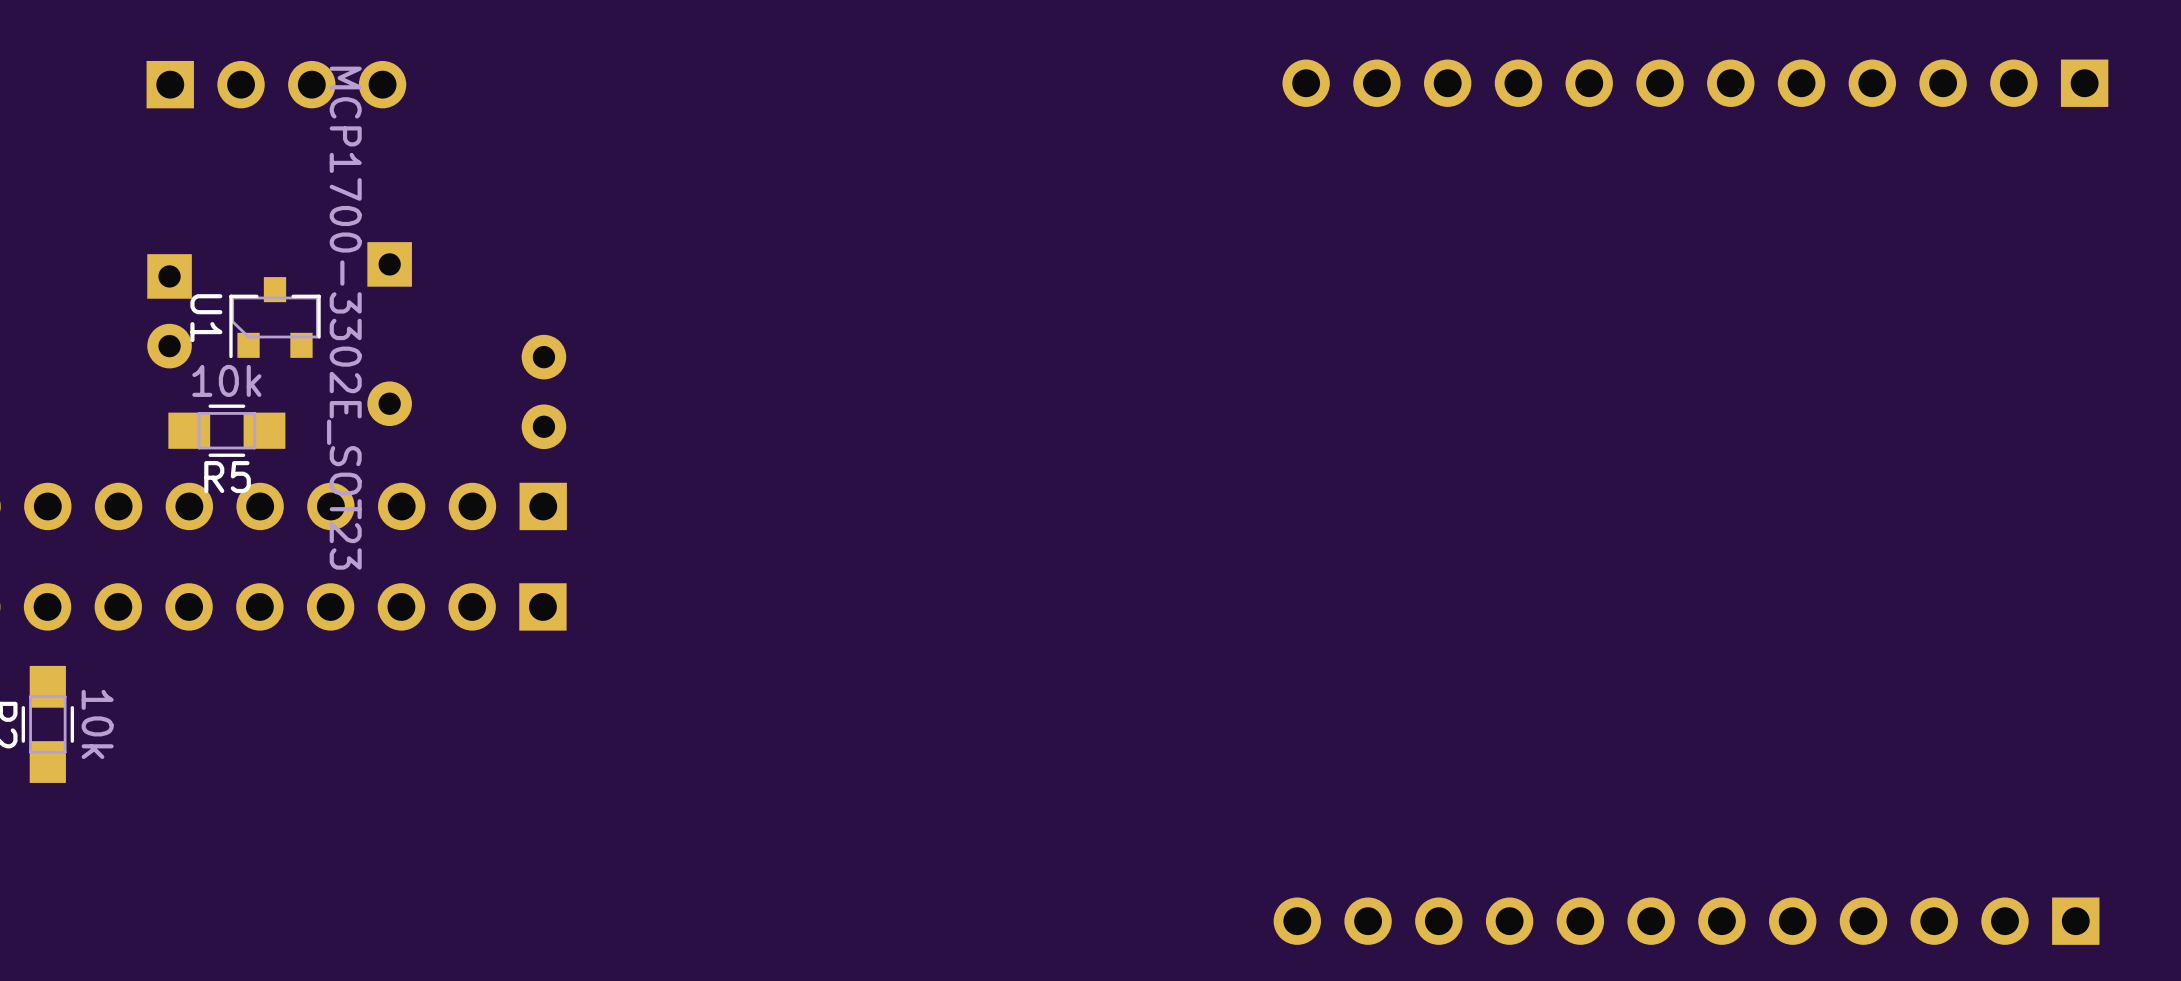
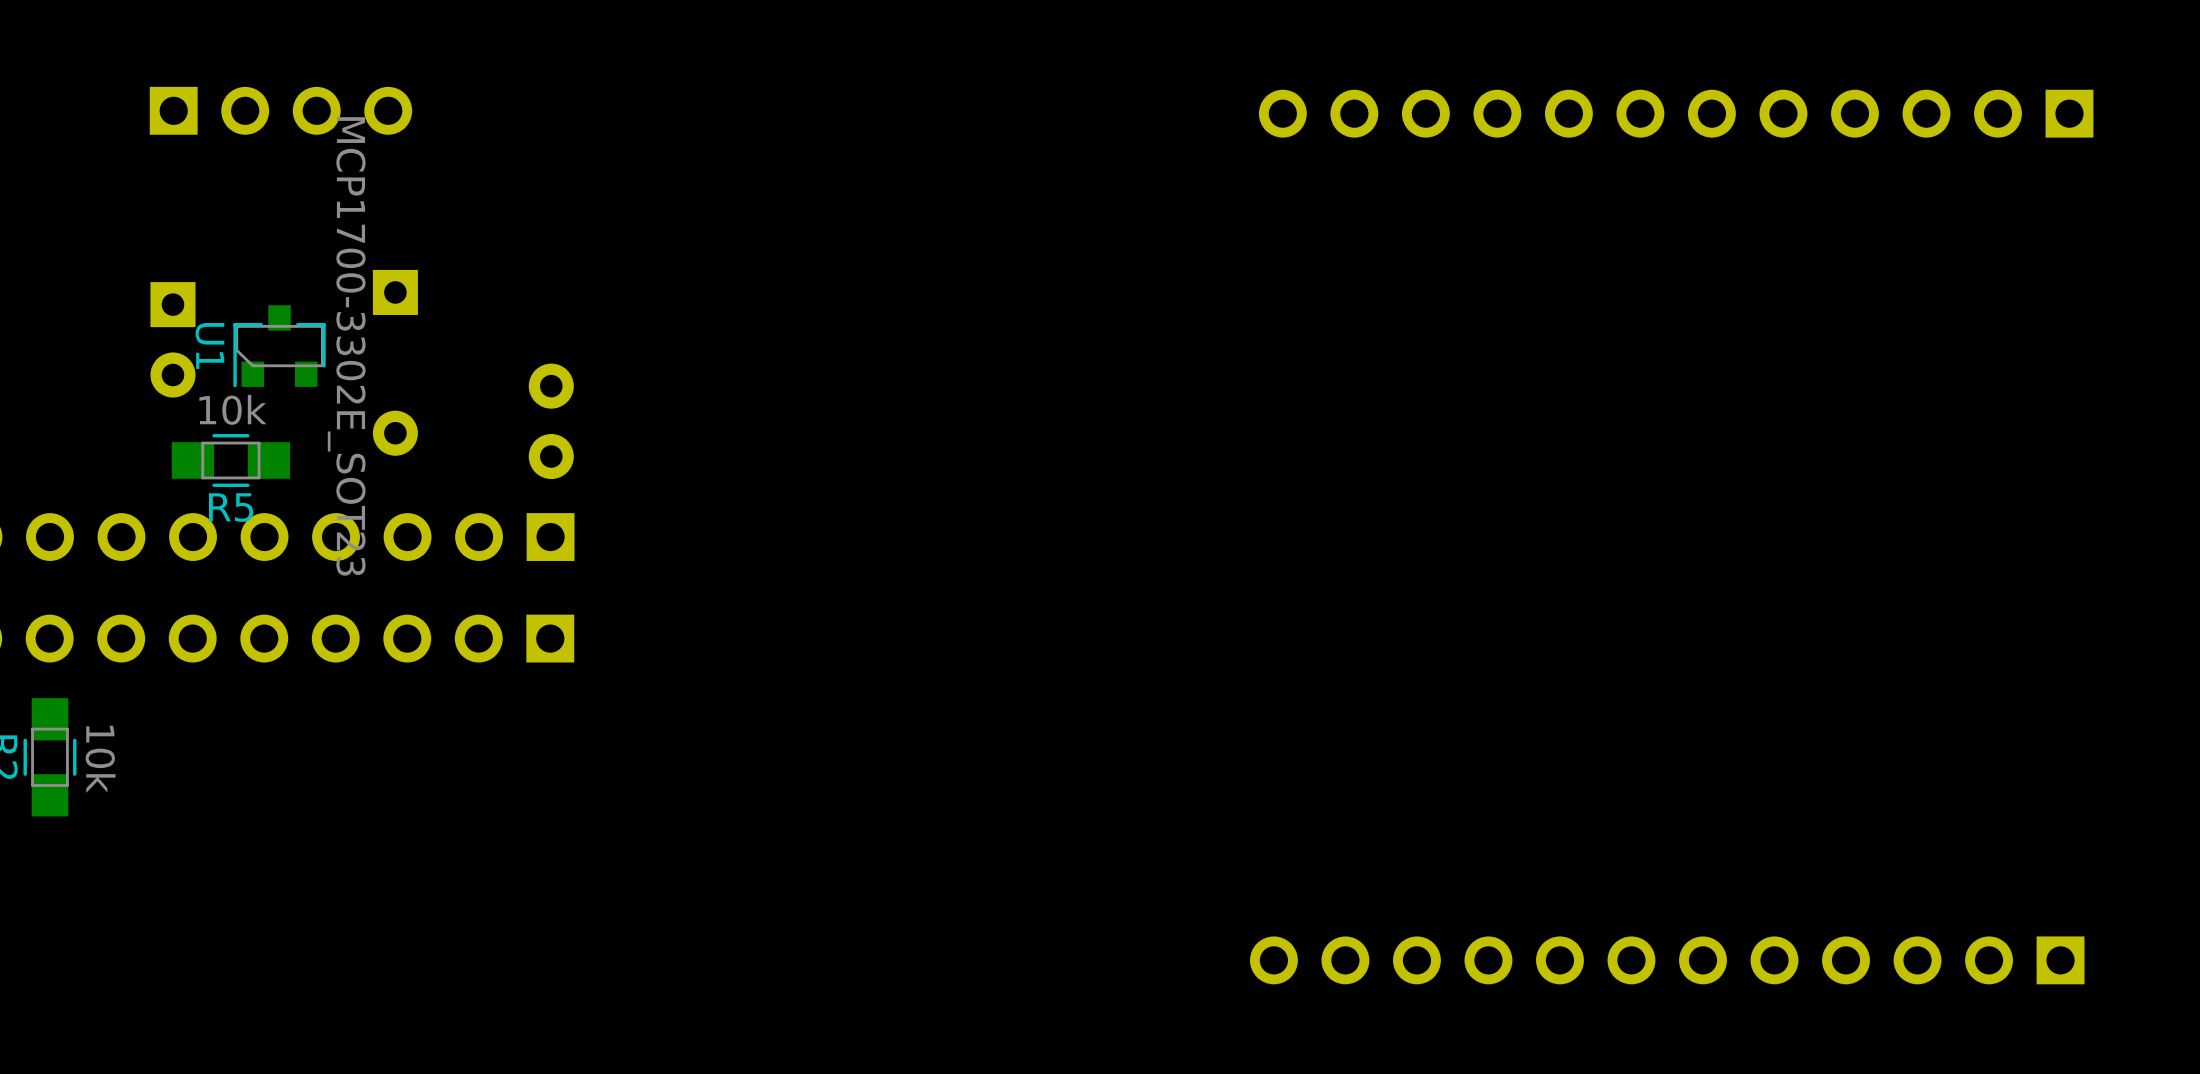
part position: (1695, 83) -> (1676, 113)
part position: (1686, 921) -> (1667, 960)

